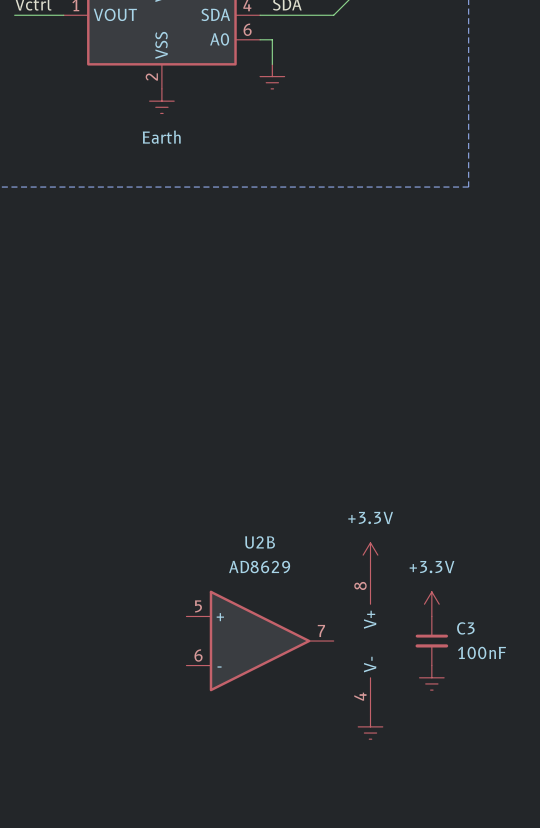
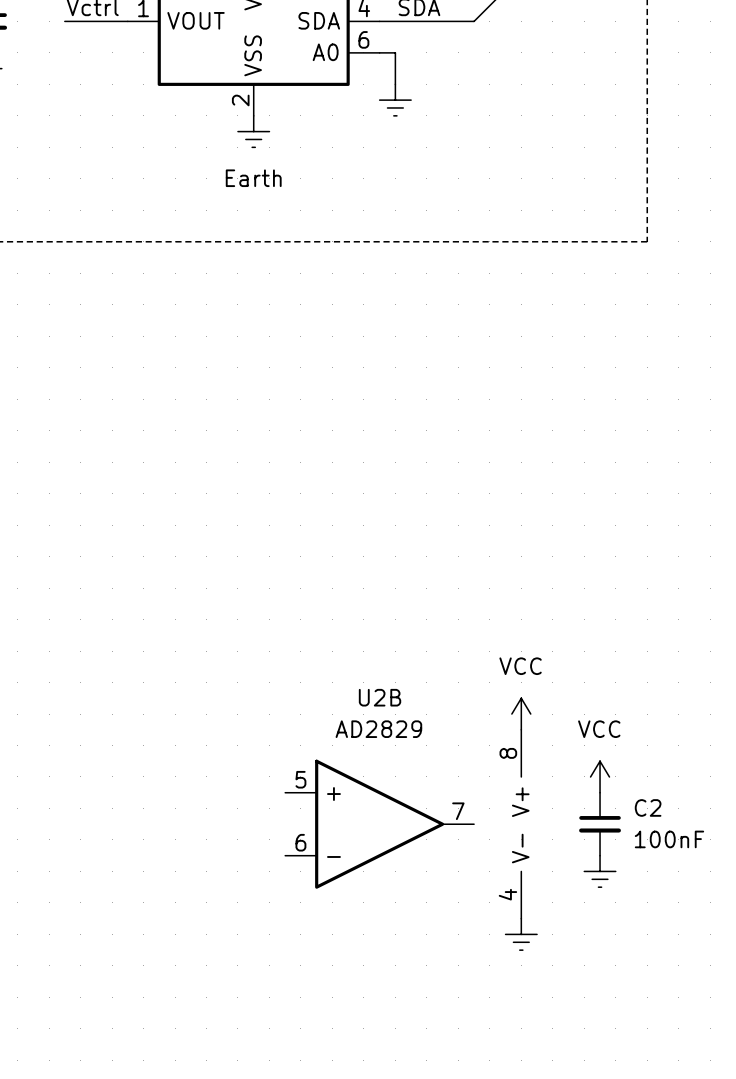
power symbol: +3.3V (370, 555) -> VCC (521, 714)
U2B value: AD8629 (259, 567) -> AD2829 (378, 729)
power symbol: +3.3V (431, 604) -> VCC (600, 776)
C3 name: C3 (465, 628) -> C2 (648, 807)

